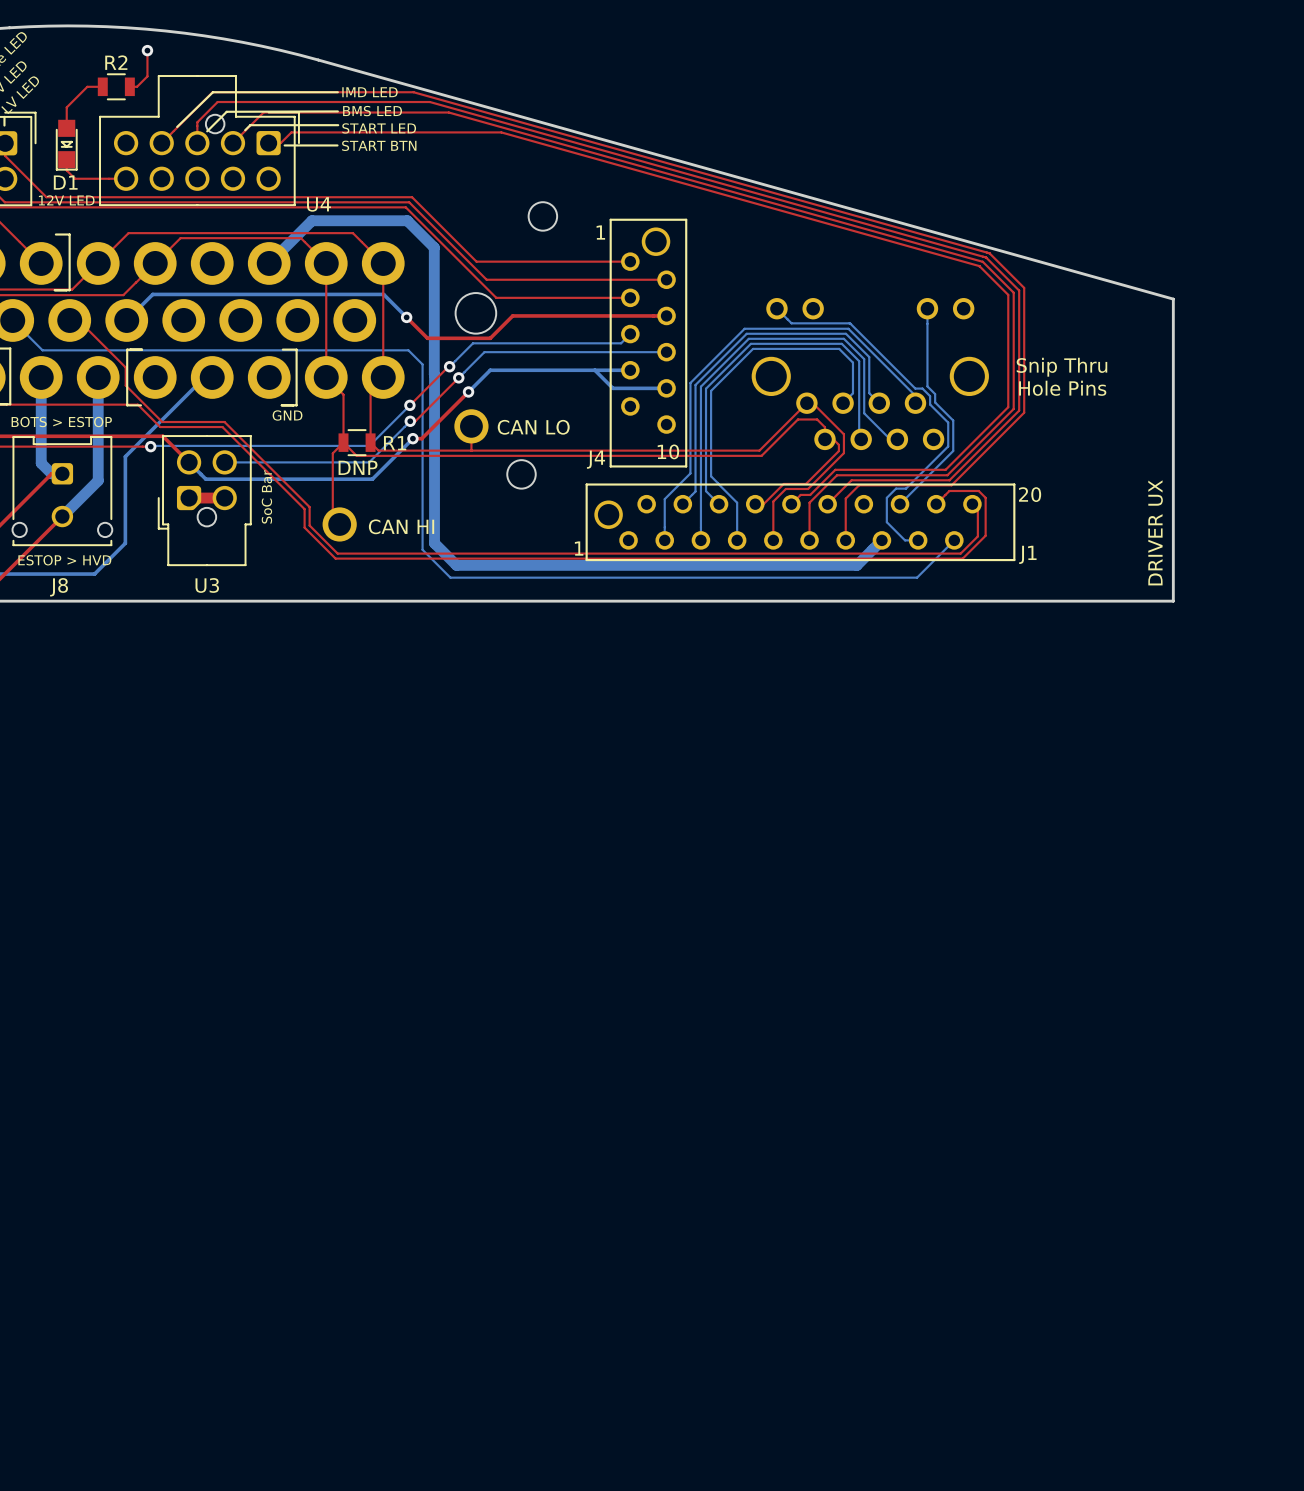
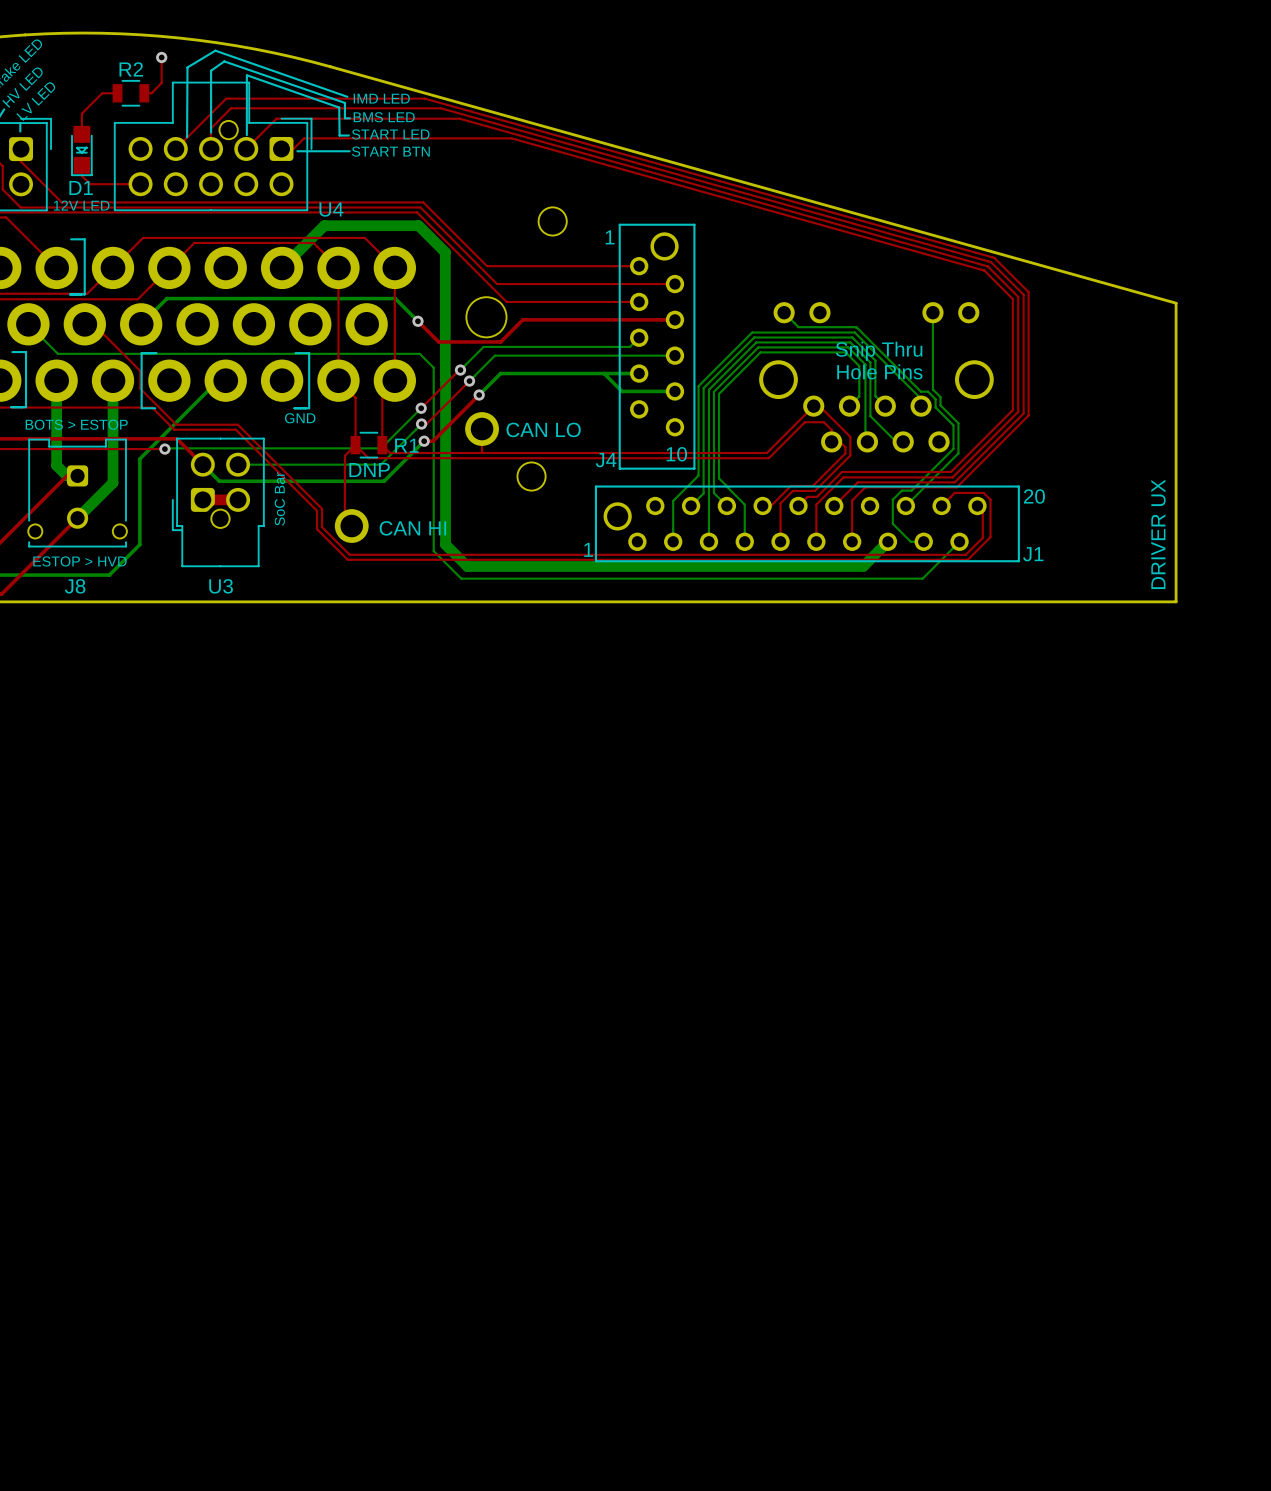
line: none -> (246, 75) (246, 135)
line: none -> (247, 75) (339, 107) (339, 135) (348, 135)
line: none -> (347, 96) (215, 50) (187, 67) (187, 137)
line: (337, 92) (212, 92) (177, 126) -> none
line: (337, 111) (226, 111) (207, 131) -> none
line: none -> (349, 118) (344, 118) (344, 102) (224, 61) (211, 70) (211, 132)
line: (338, 125) (250, 125) (245, 130) -> none
text position: Snip Thru (1061, 367) -> Snip Thru (879, 351)
text position: Hole Pins (1062, 388) -> Hole Pins (879, 371)

